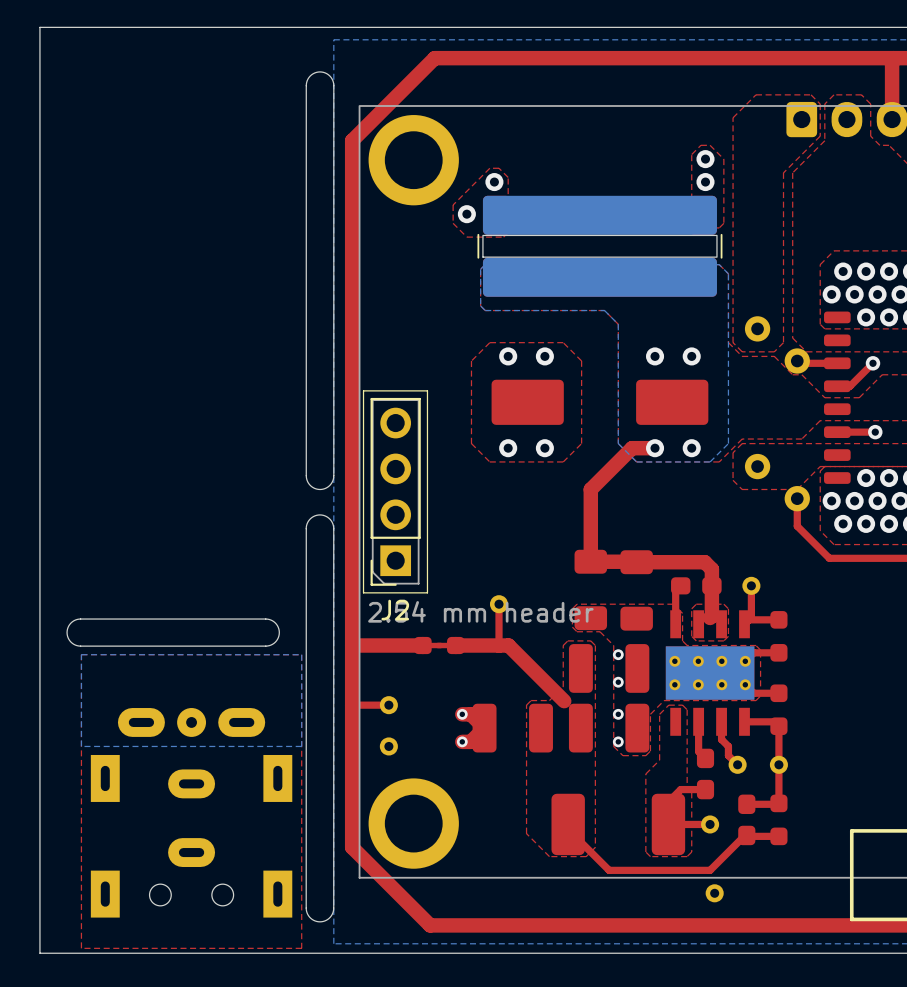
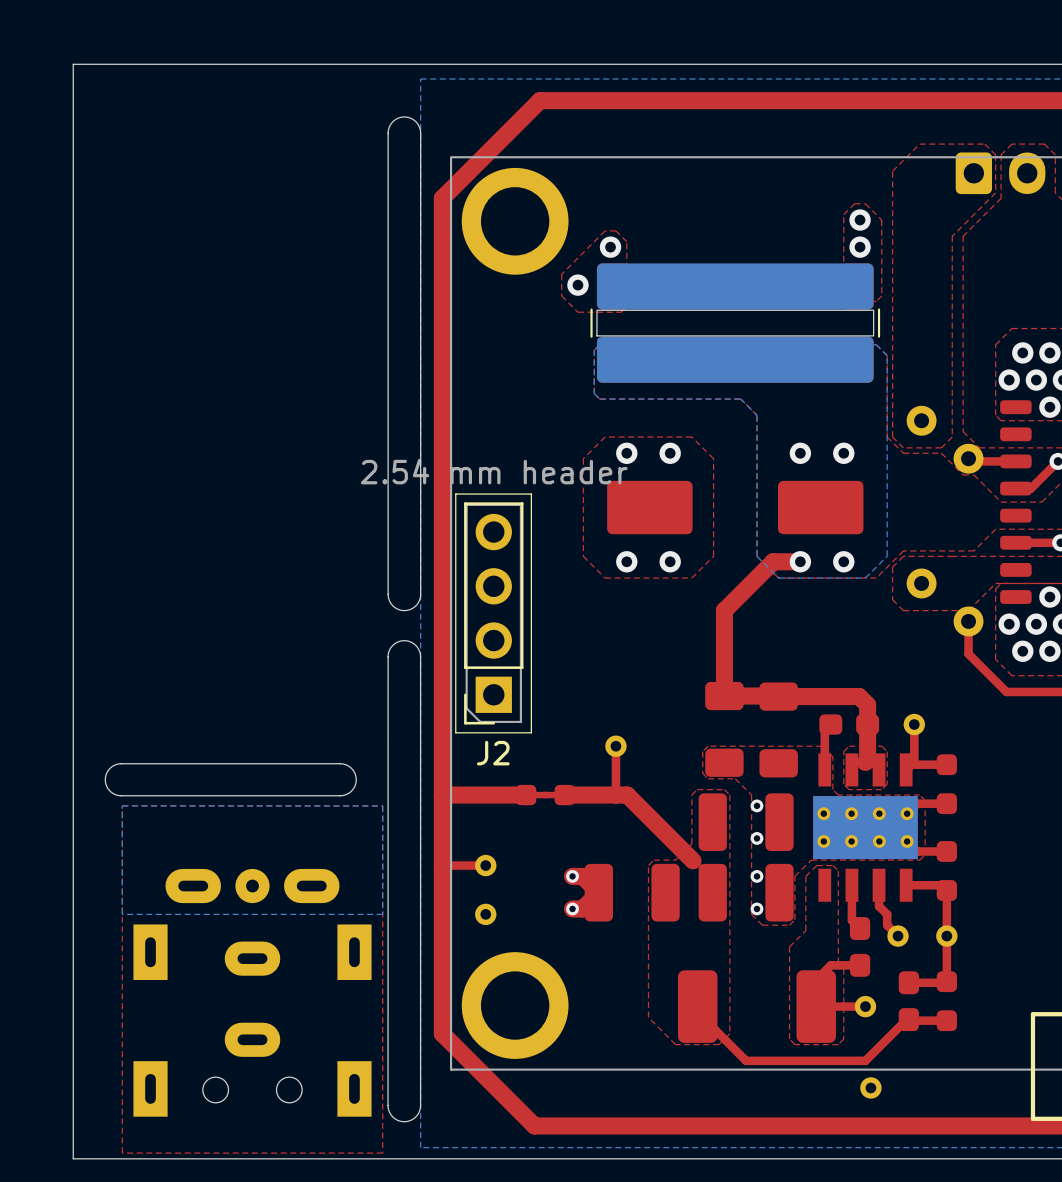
J2 value position: 2.54 mm header (480, 611) -> 2.54 mm header (494, 471)

